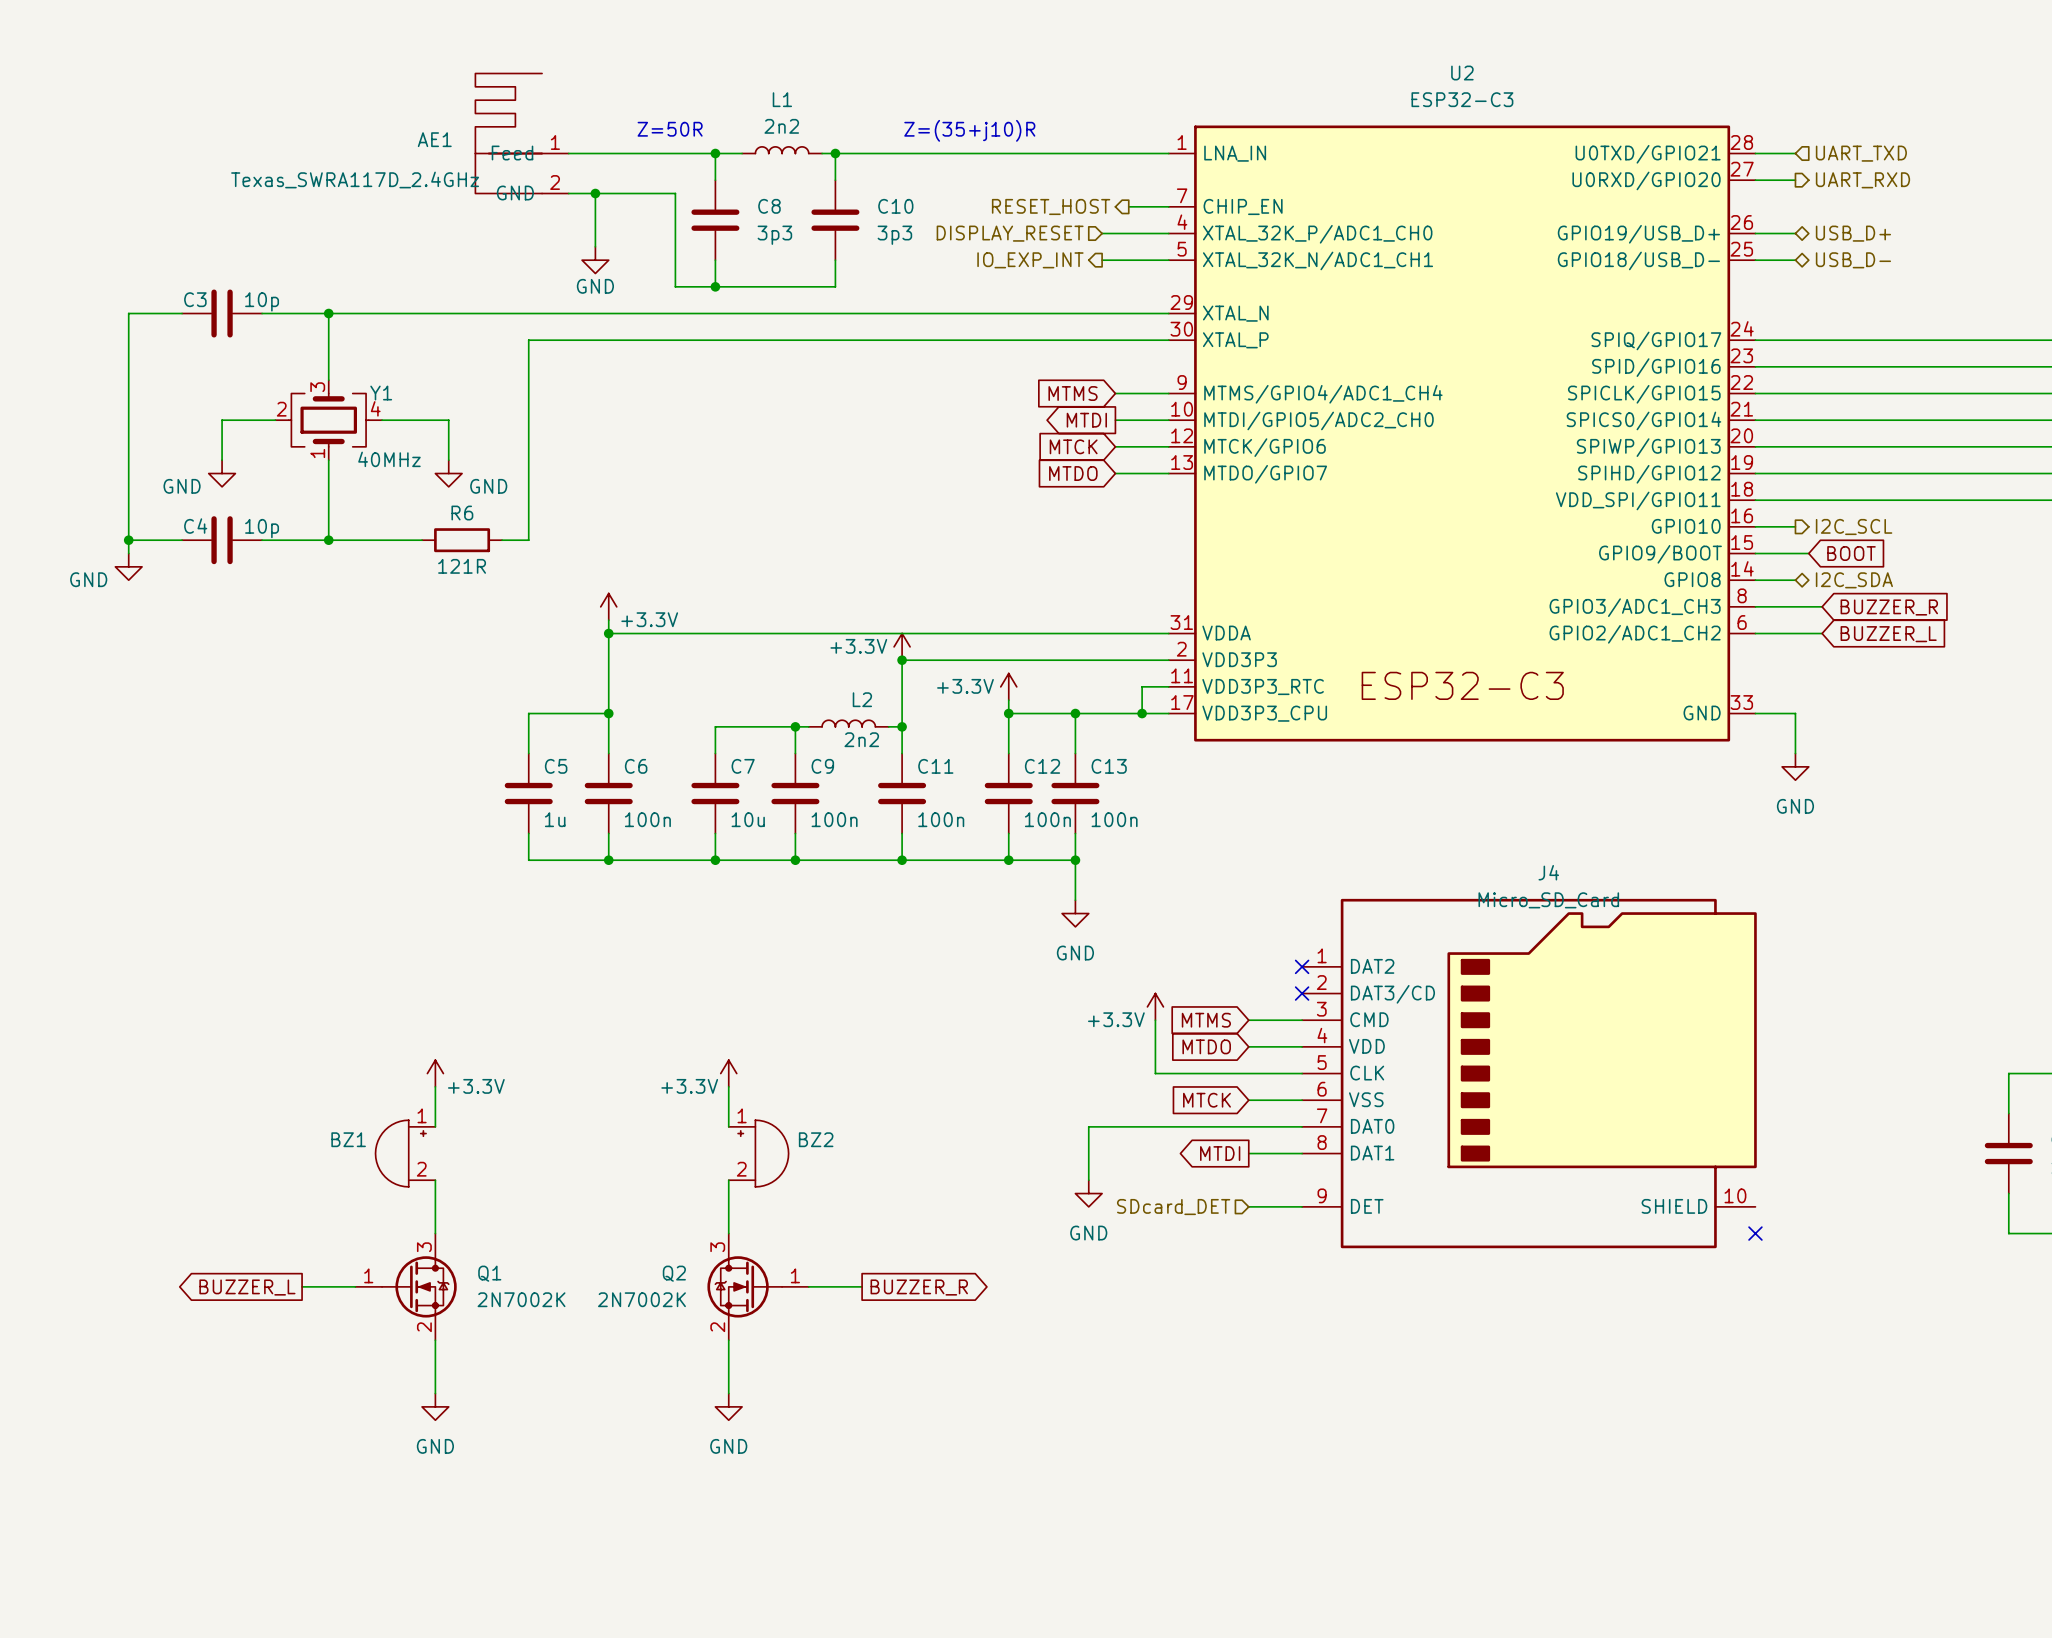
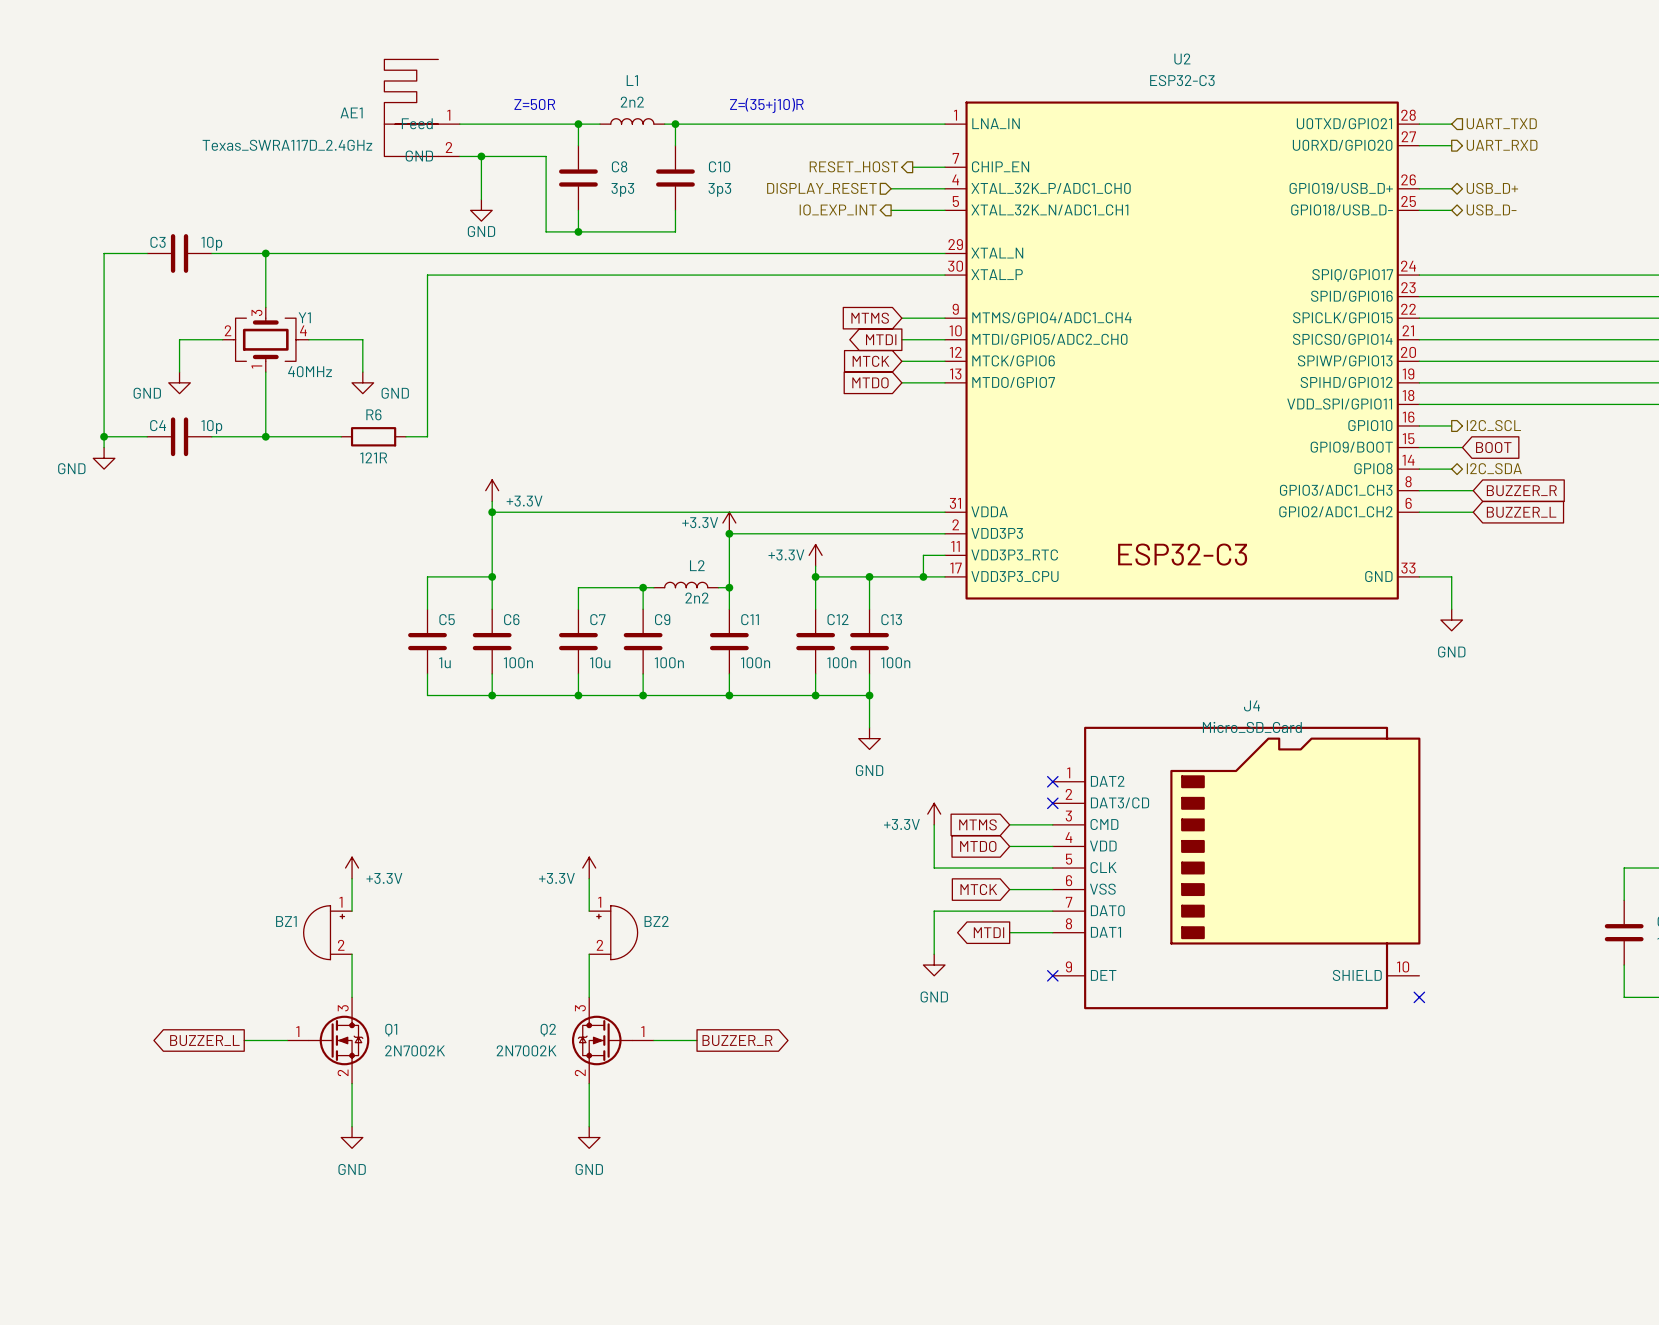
wire: (1155, 1126) (1088, 1126) (1088, 1180) -> (934, 911) (934, 954)
power symbol position: GND (1088, 1193) -> GND (934, 965)
wire: (1248, 1206) (1302, 1206) -> none
no-connect mark: none -> (1052, 975)
hierarchical label: SDcard_DET (1173, 1207) -> none

